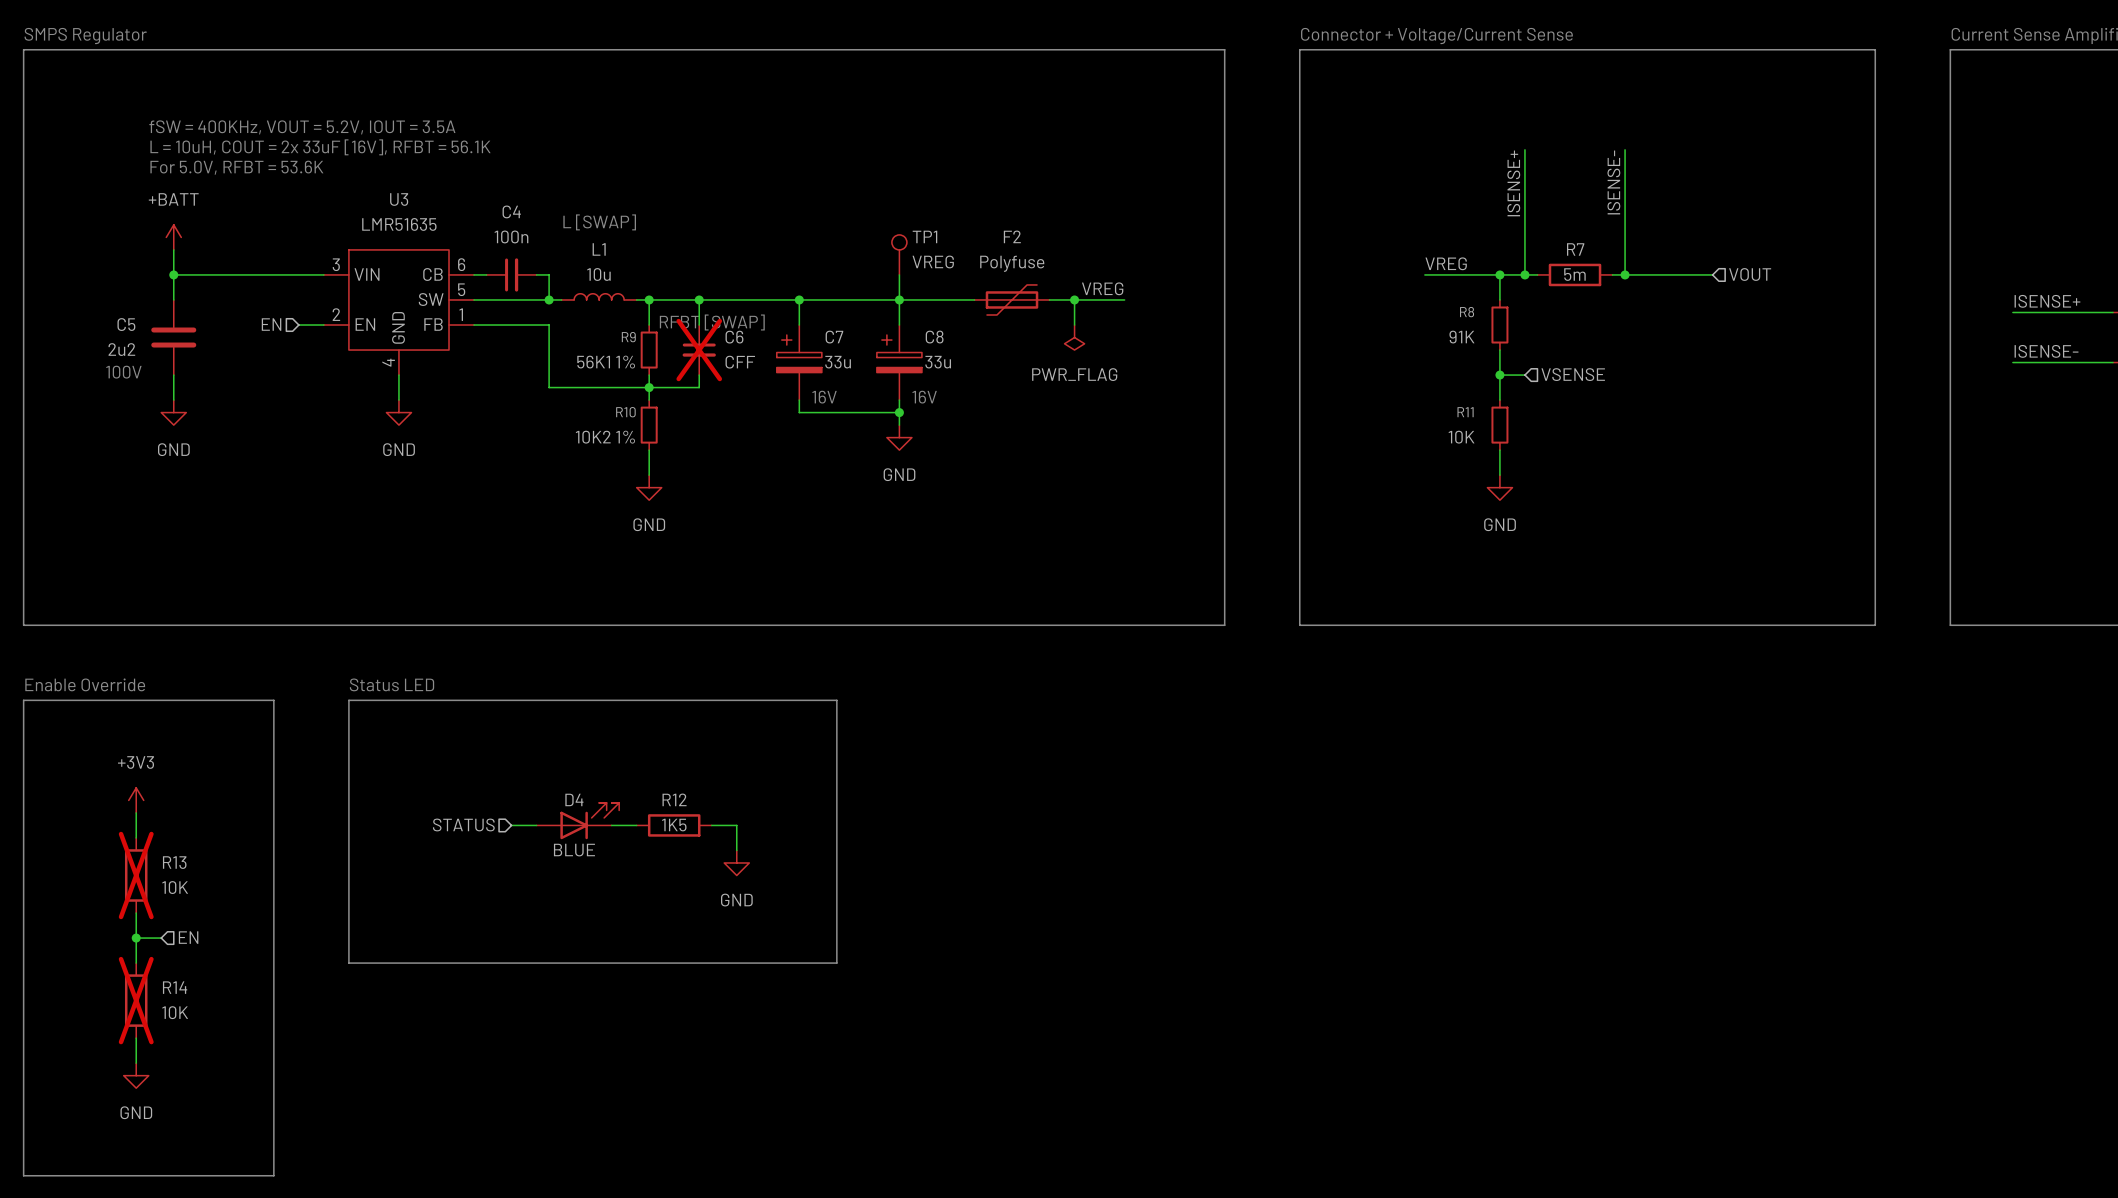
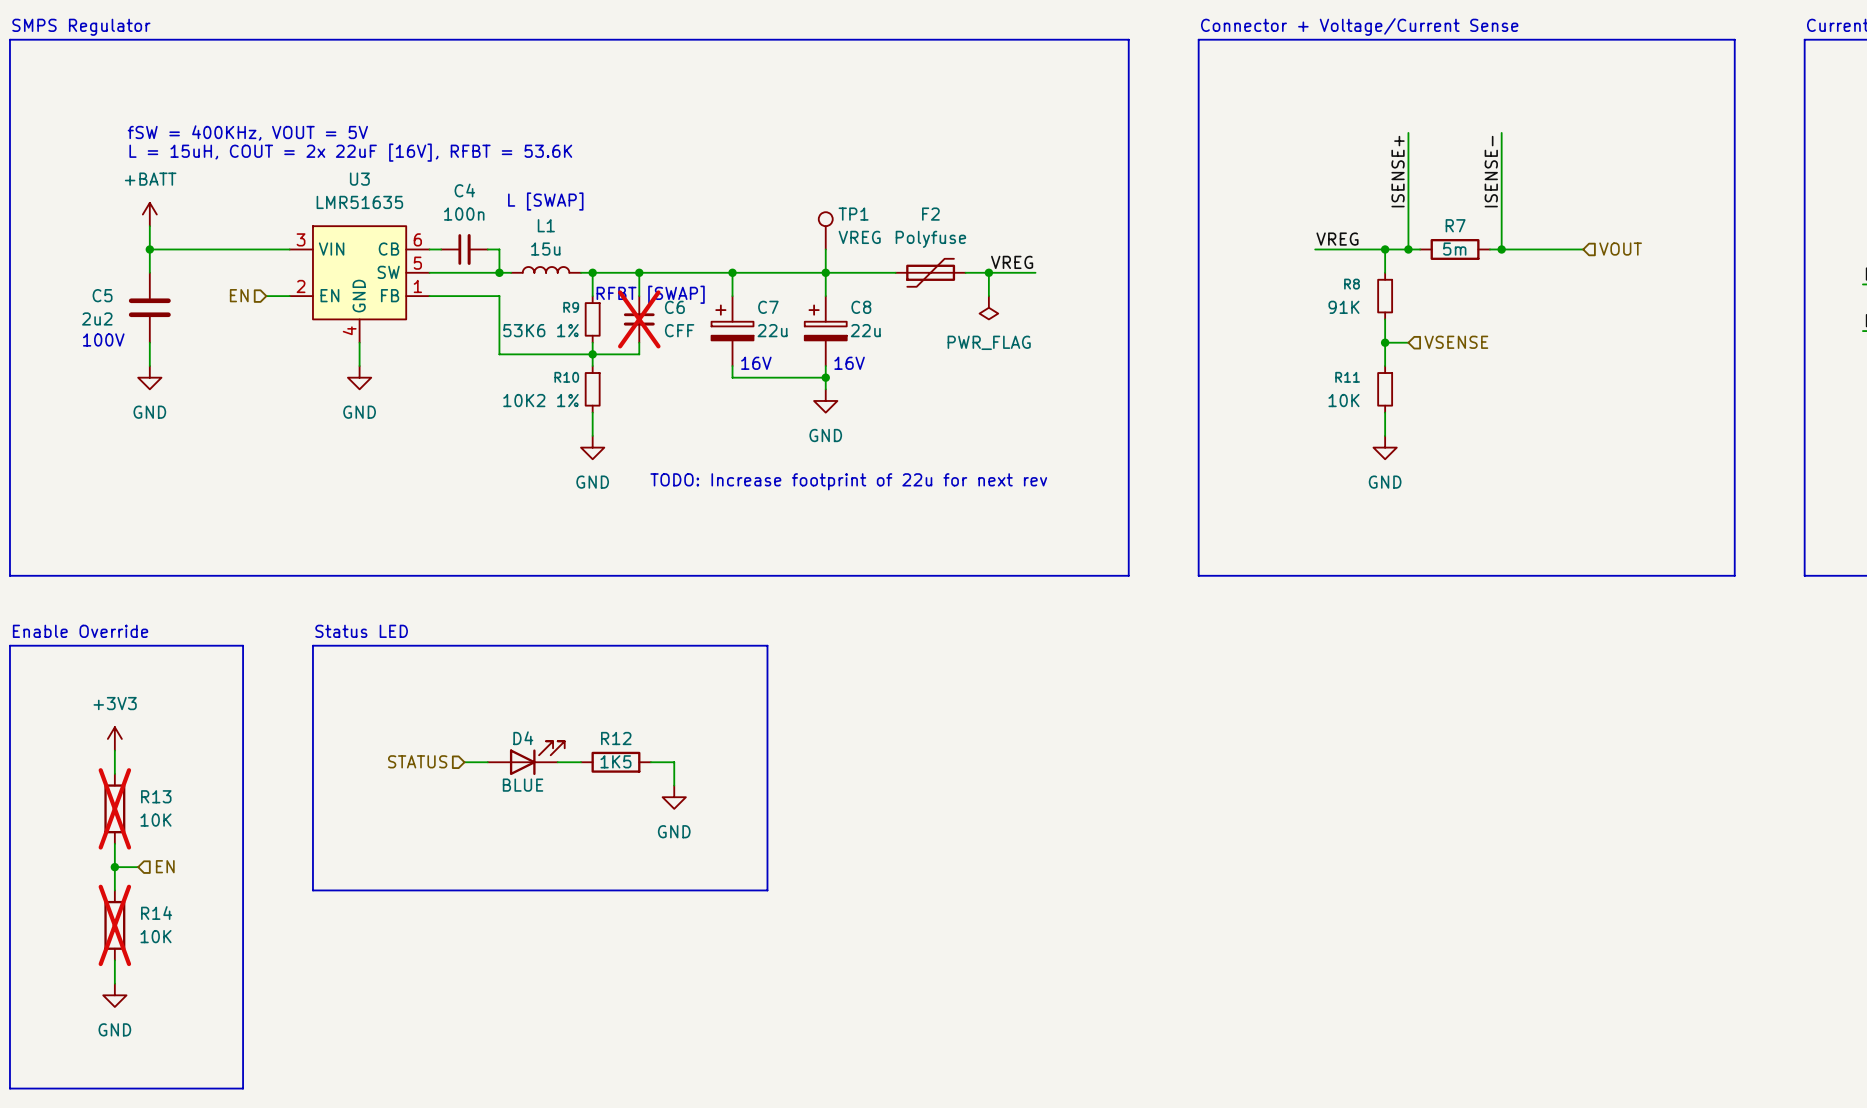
text: fSW = 400KHz, VOUT = 5.2V, IOUT = 3.5A (302, 127) -> none
text: L = 10uH, COUT = 2x 33uF [16V], RFBT = 56.1K (320, 147) -> fSW = 400KHz, VOUT = 5V (247, 133)
text: For 5.0V, RFBT = 53.6K (236, 167) -> L = 15uH, COUT = 2x 22uF [16V], RFBT = 53.6K (350, 152)
L1 value: 10u (598, 274) -> 15u (545, 249)
R9 value: 56K1 1% (606, 362) -> 53K6 1% (540, 330)
C7 value: 33u (838, 362) -> 22u (772, 330)
C8 value: 33u (938, 362) -> 22u (865, 330)
text: none -> TODO: Increase footprint of 22u for next rev (848, 481)

